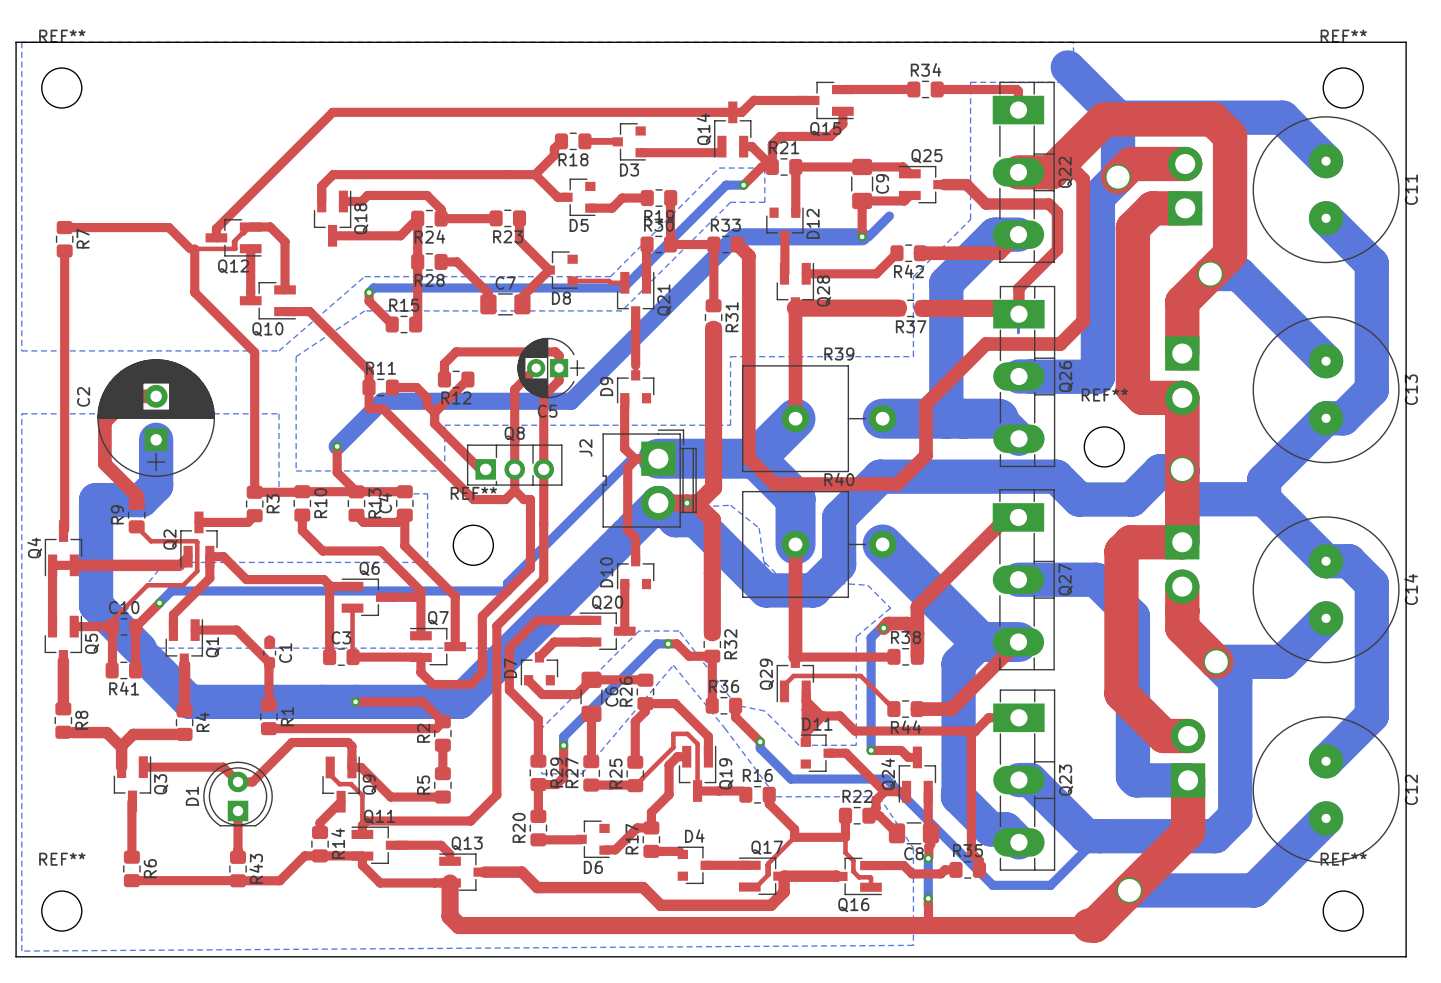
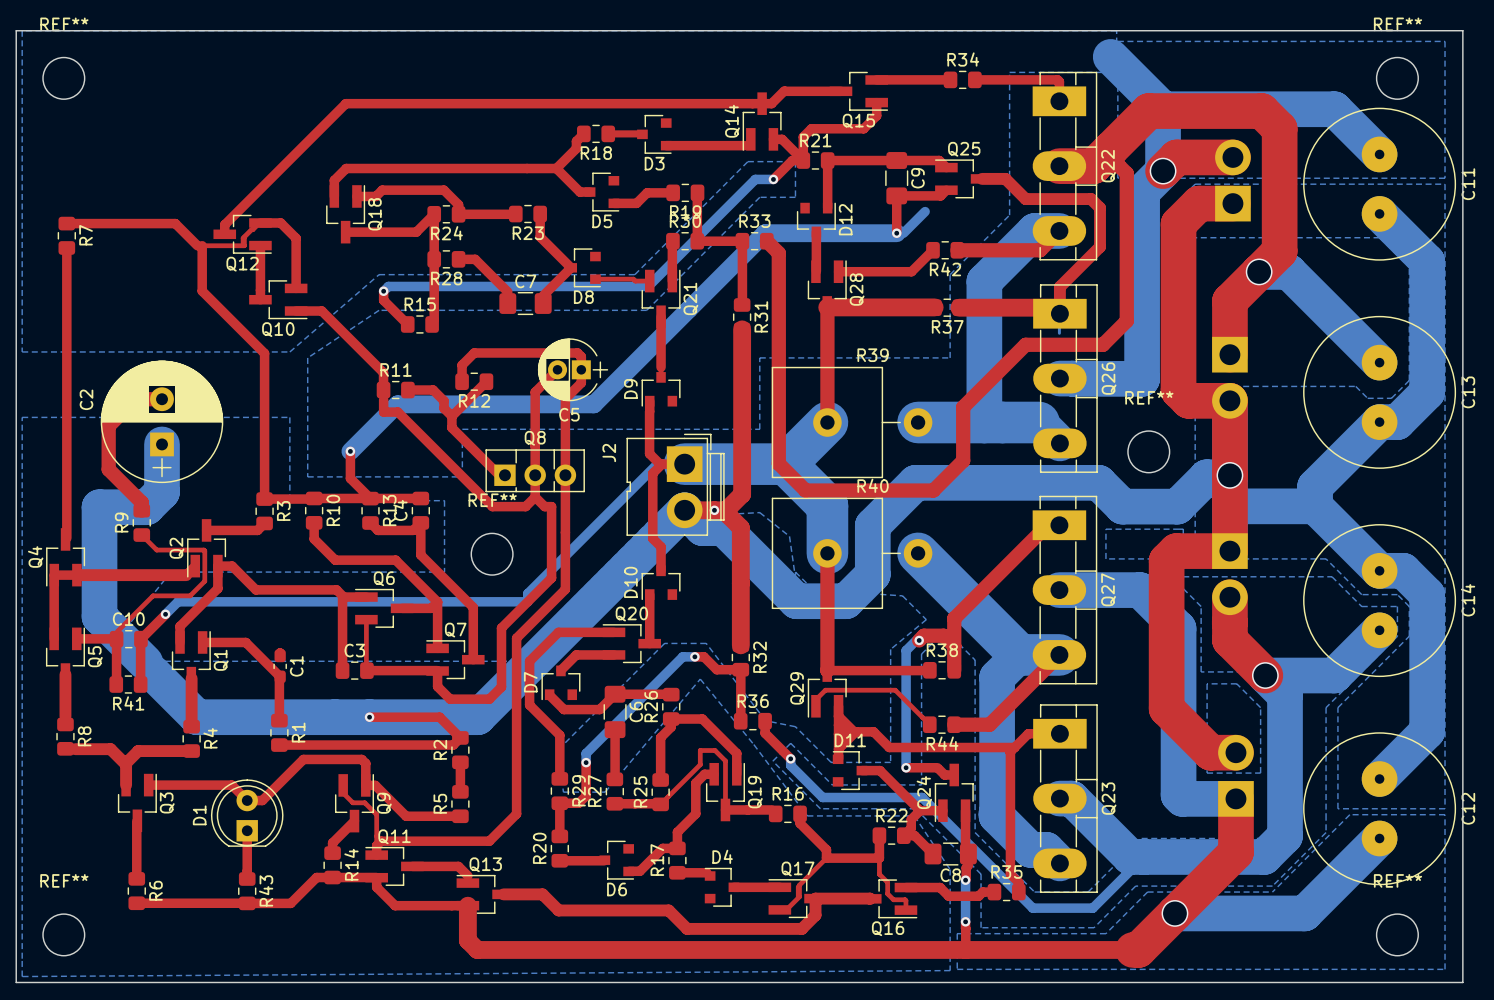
bottom zone outline: none -> (1117, 41) (1445, 41) (1445, 178) (1117, 178) (1117, 41)
bottom zone outline: none -> (1195, 184) (1177, 202) (1177, 237) (1379, 237) (1409, 267) (1409, 380) (1391, 398) (1367, 398) (1355, 386) (1195, 386) (1195, 558) (1326, 558) (1361, 594) (1397, 594) (1409, 606) (1409, 636) (1337, 707) (1337, 808) (1445, 808) (1445, 184) (1195, 184)
bottom zone outline: none -> (1105, 529) (1183, 529) (1183, 576) (1331, 576) (1361, 606) (1397, 606) (1397, 636) (1326, 707) (1326, 832) (1272, 886) (1135, 886) (1094, 927) (981, 927) (981, 874) (915, 808) (820, 808) (772, 761) (790, 743) (832, 784) (921, 784) (921, 654) (945, 630) (975, 660) (975, 832) (1034, 892) (1088, 892) (1141, 838) (1260, 838) (1272, 826) (1272, 701) (1242, 671) (1201, 671) (1201, 606) (1153, 558) (1105, 558) (1105, 529)
bottom zone outline: none -> (1207, 683) (1207, 773) (1260, 773) (1260, 707) (1236, 683) (1207, 683)
bottom zone outline: none -> (1349, 814) (1445, 814) (1445, 969) (957, 969) (957, 933) (1105, 933) (1147, 892) (1272, 892) (1349, 814)

